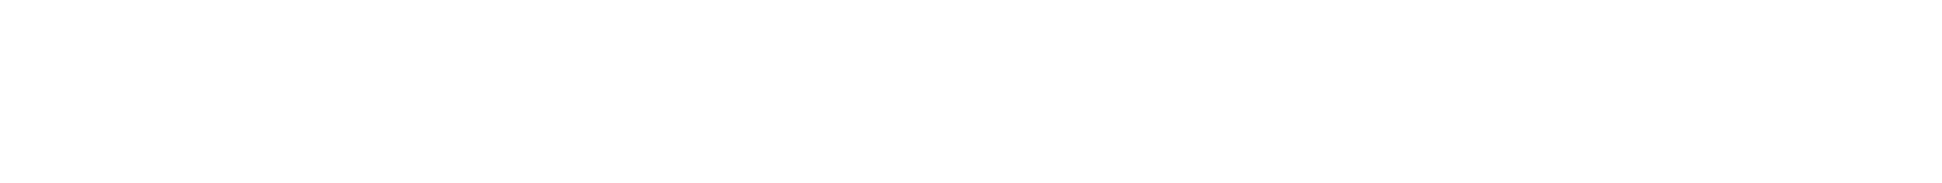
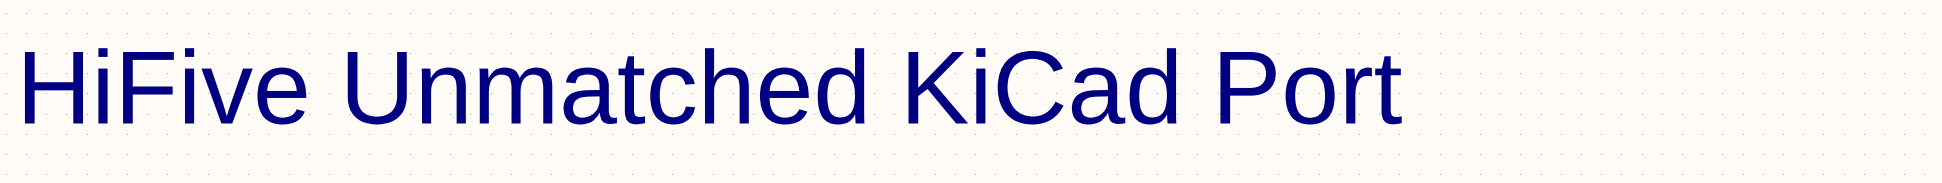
text: none -> HiFive Unmatched KiCad Port (713, 86)

